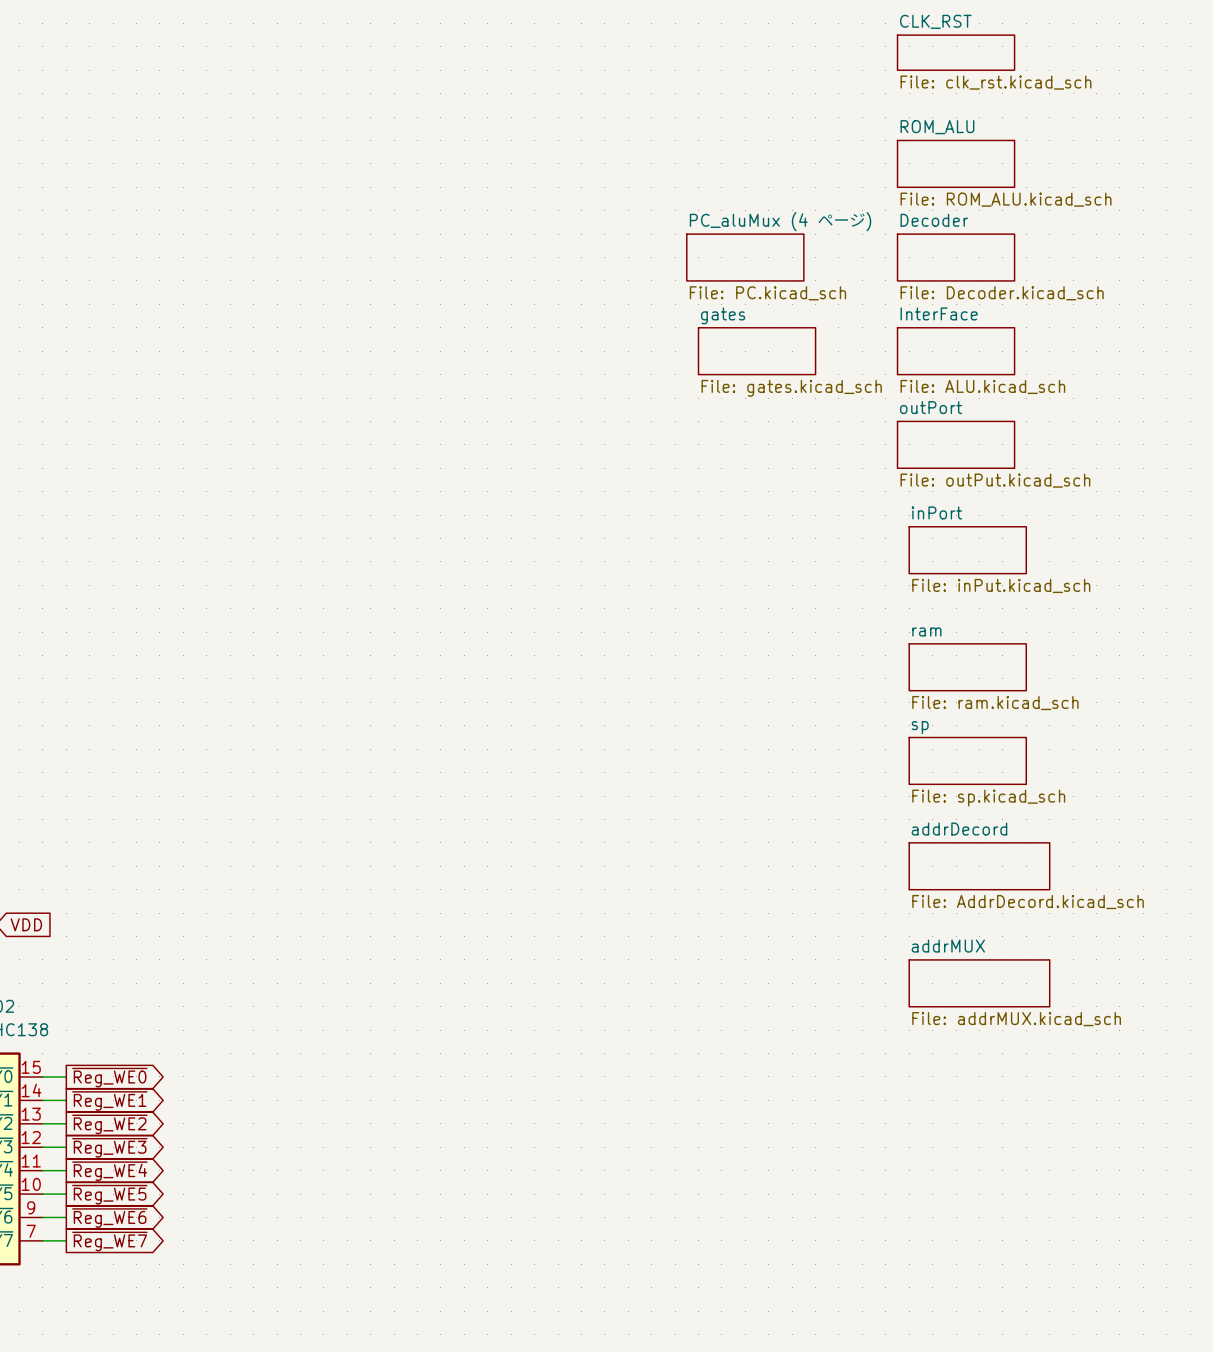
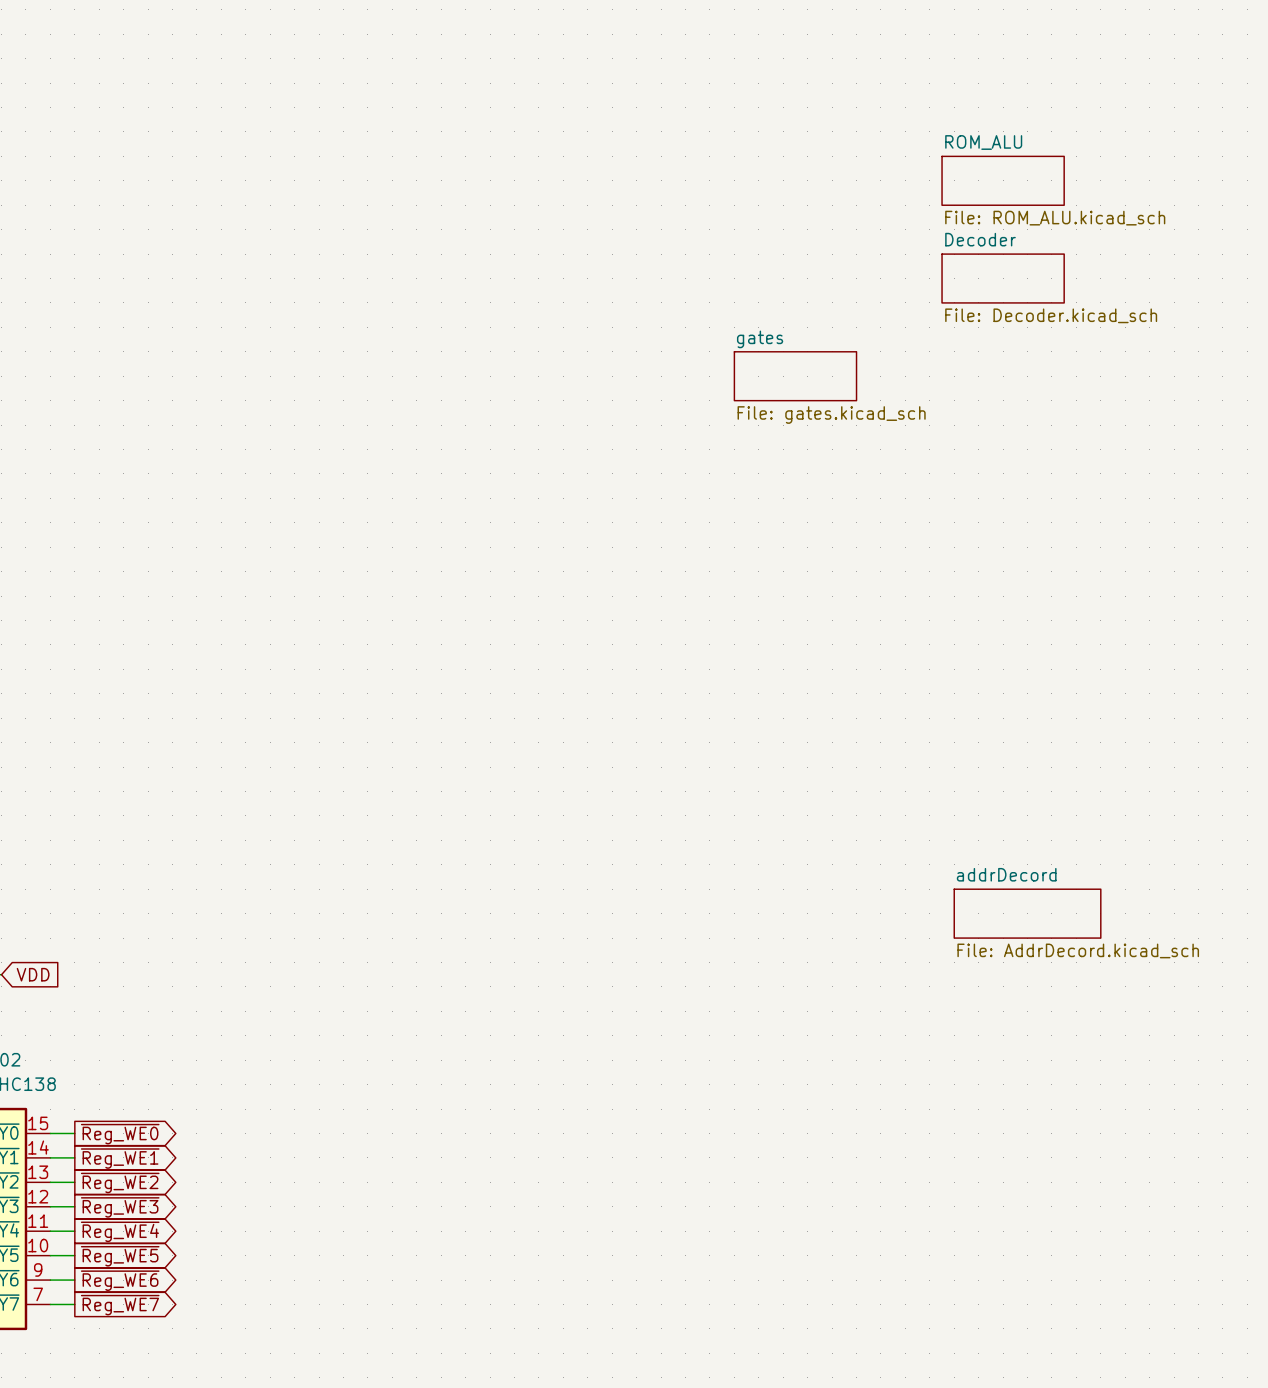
sheet CLK_RST: File: clk_rst.kicad_sch (956, 52) -> none
sheet PC_aluMux (4 ページ): File: PC.kicad_sch (745, 257) -> none
sheet InterFace: File: ALU.kicad_sch (956, 351) -> none
sheet outPort: File: outPut.kicad_sch (956, 444) -> none
sheet inPort: File: inPut.kicad_sch (967, 550) -> none
sheet ram: File: ram.kicad_sch (967, 667) -> none
sheet sp: File: sp.kicad_sch (967, 760) -> none
sheet addrMUX: File: addrMUX.kicad_sch (979, 983) -> none

